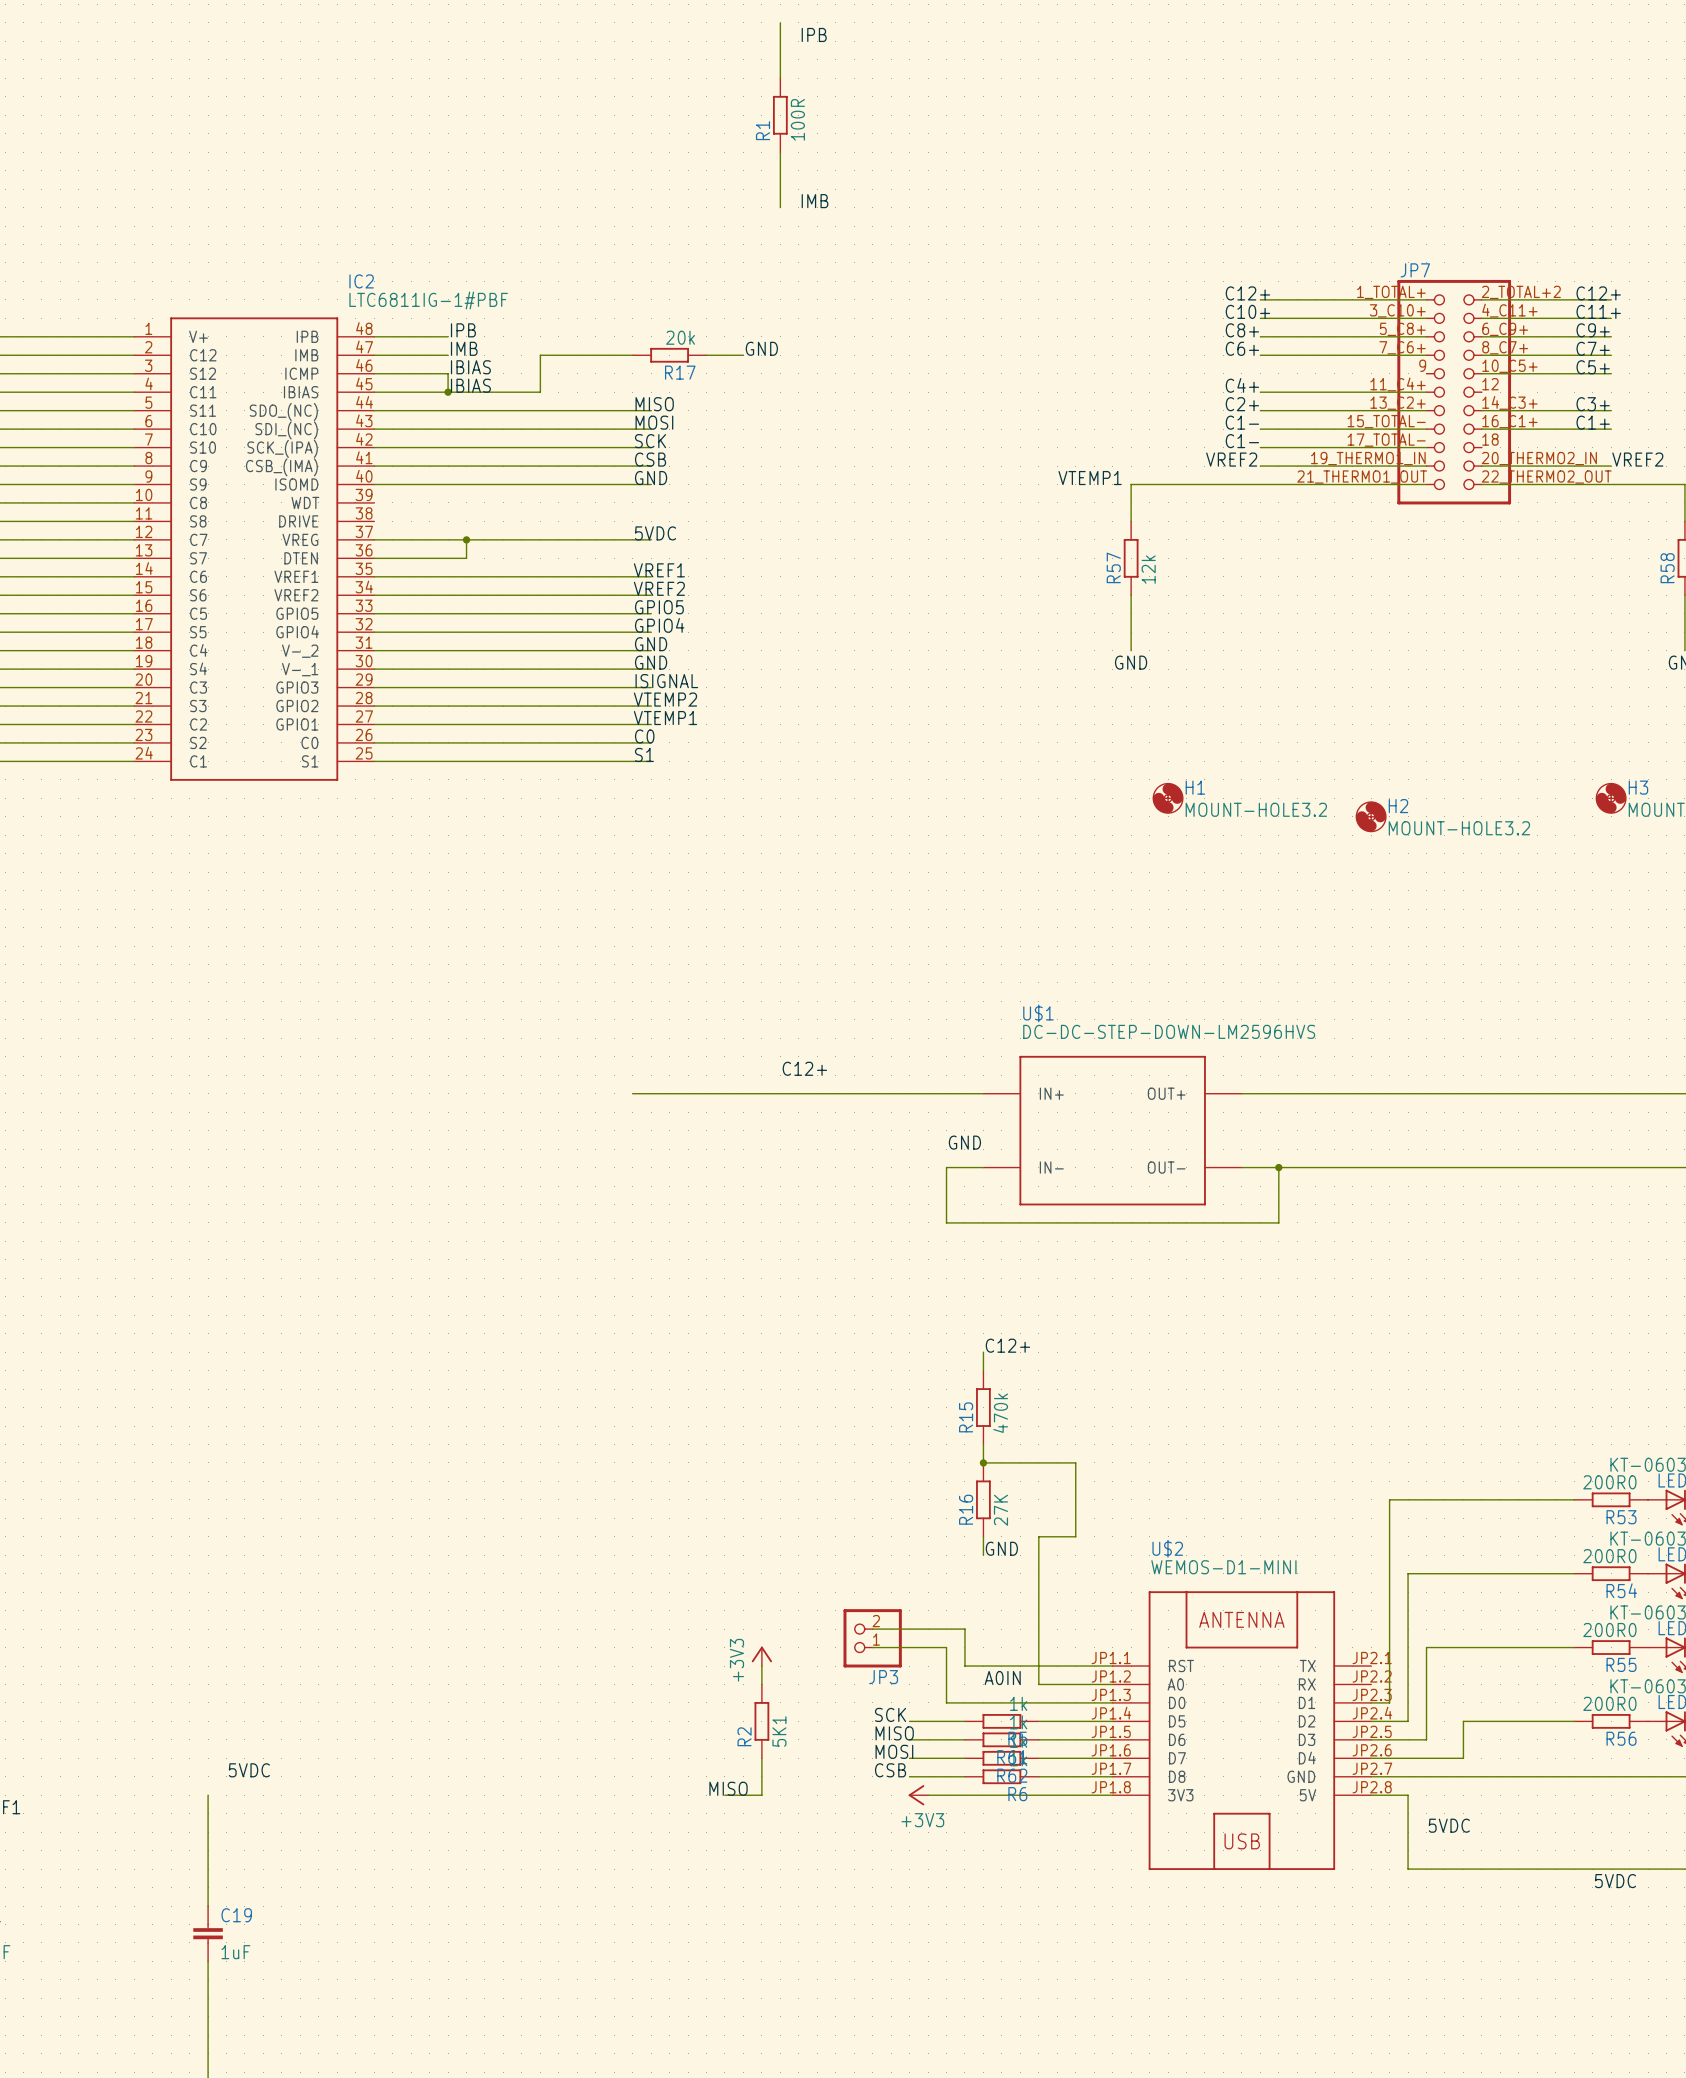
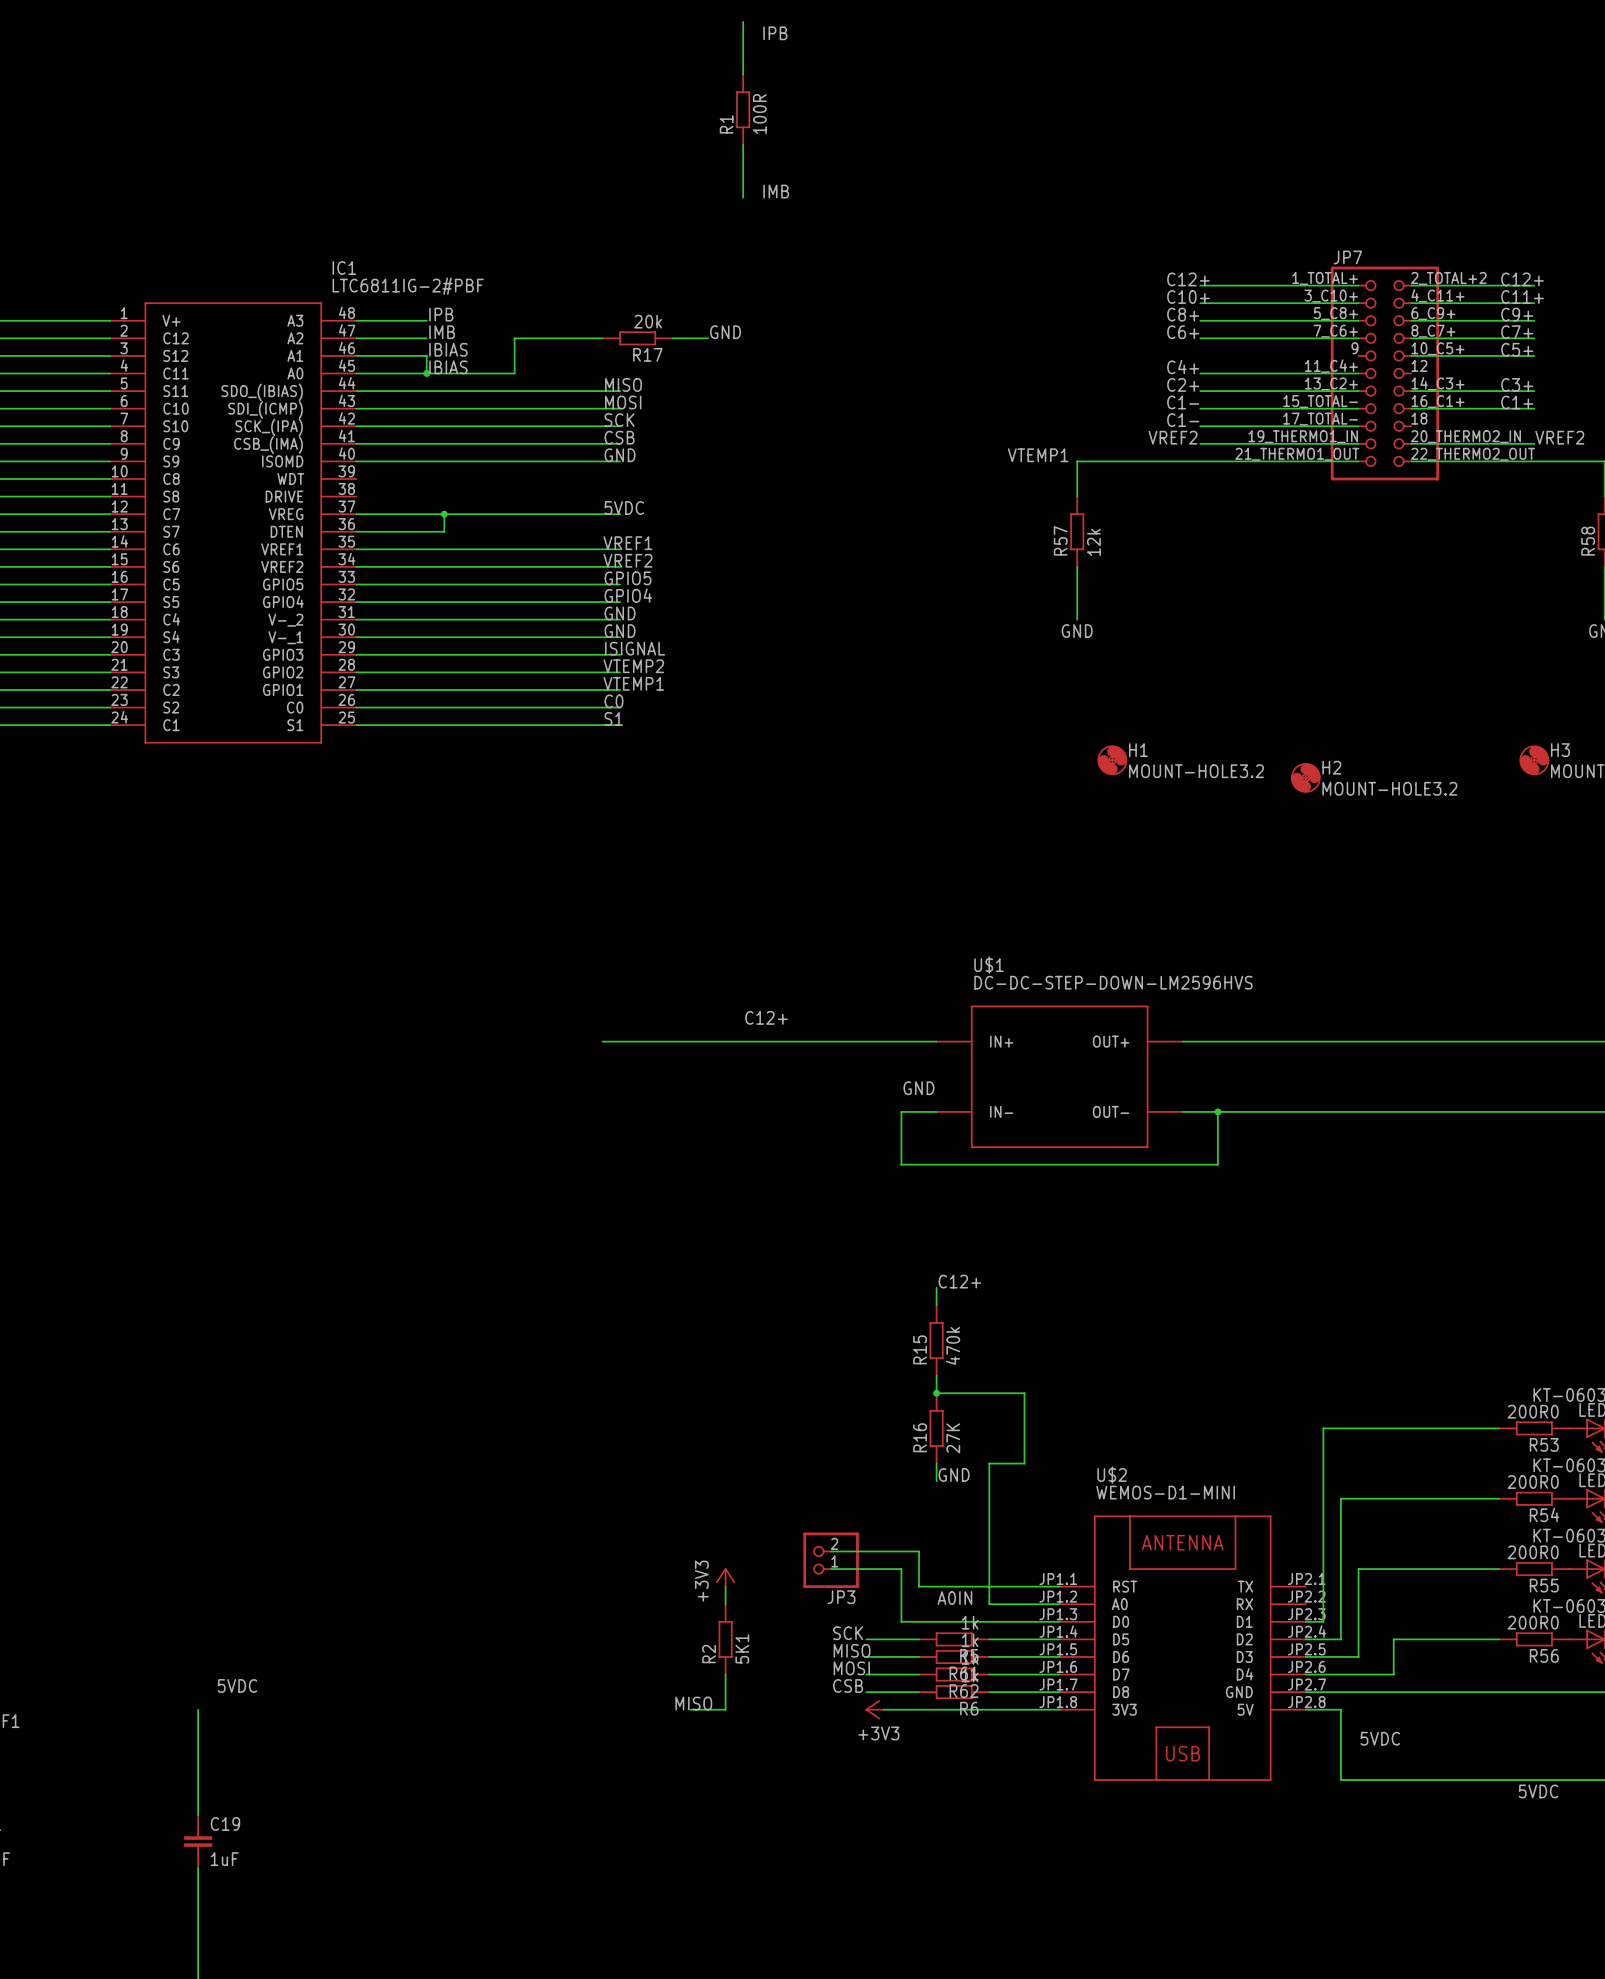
IC1: none -> LTC6811IG-2#PBF (233, 522)
IC2: LTC6811IG-1#PBF (254, 549) -> none

